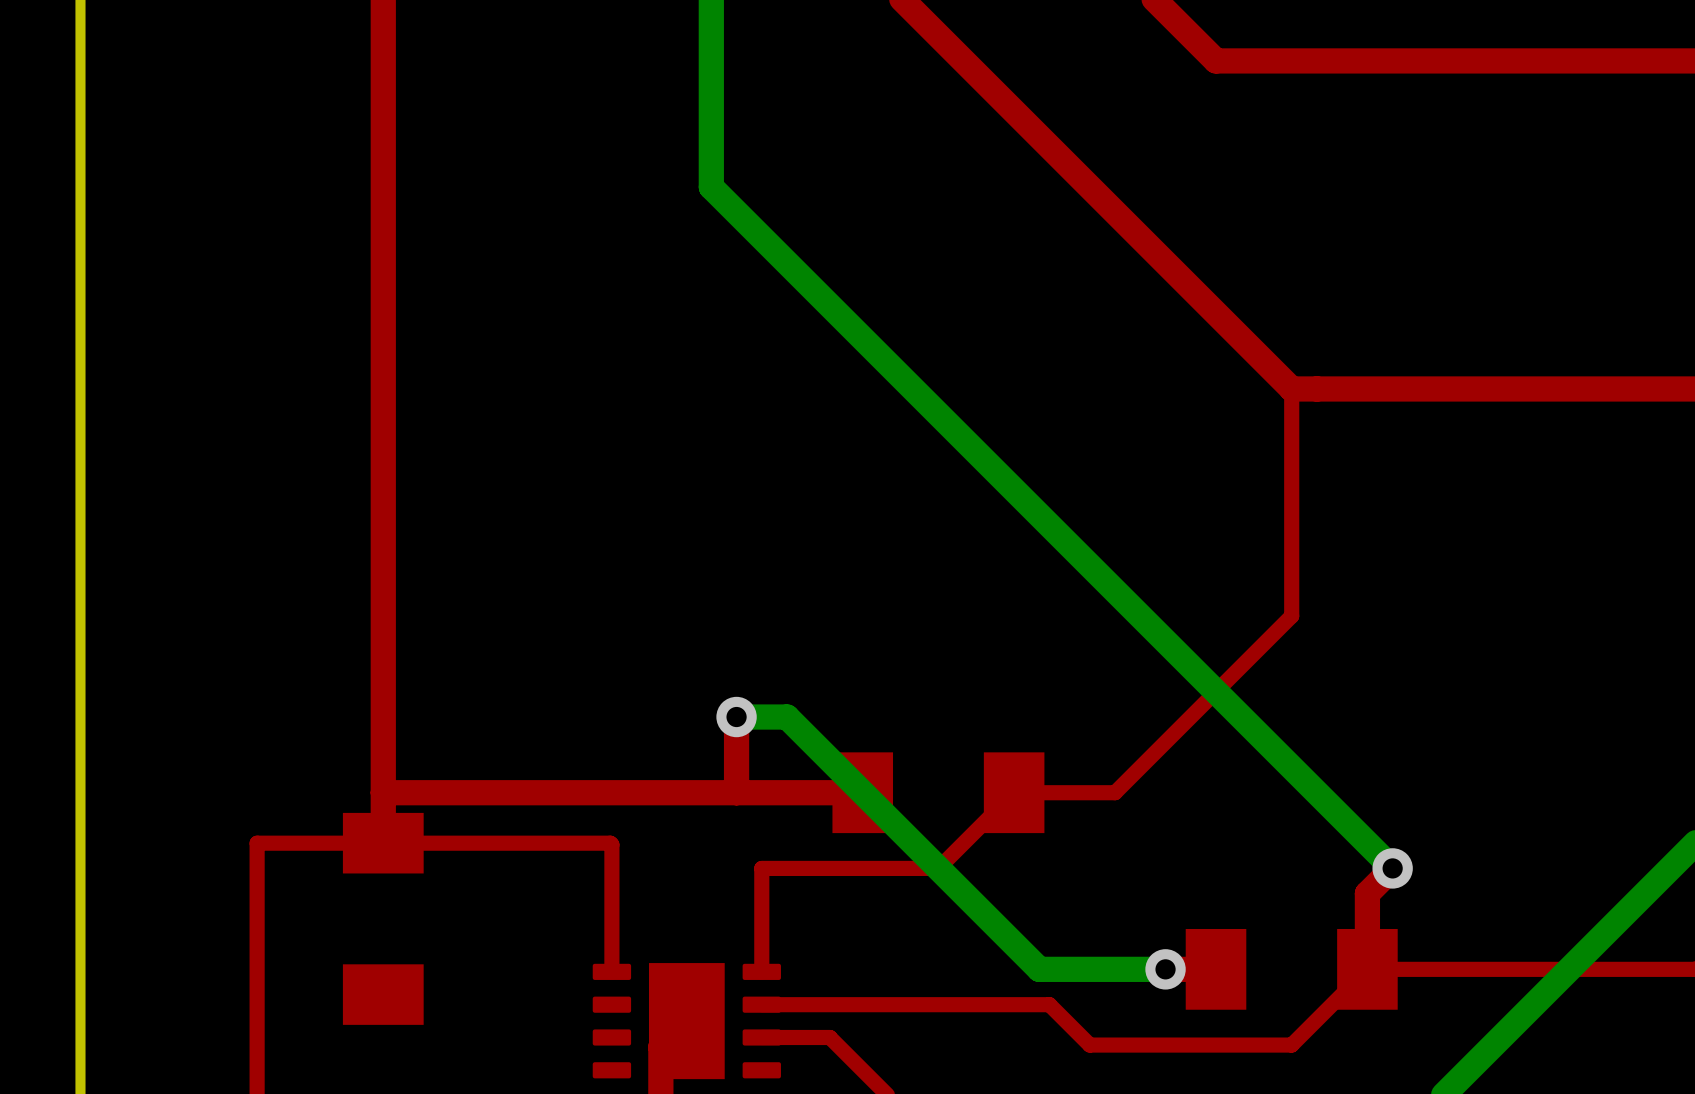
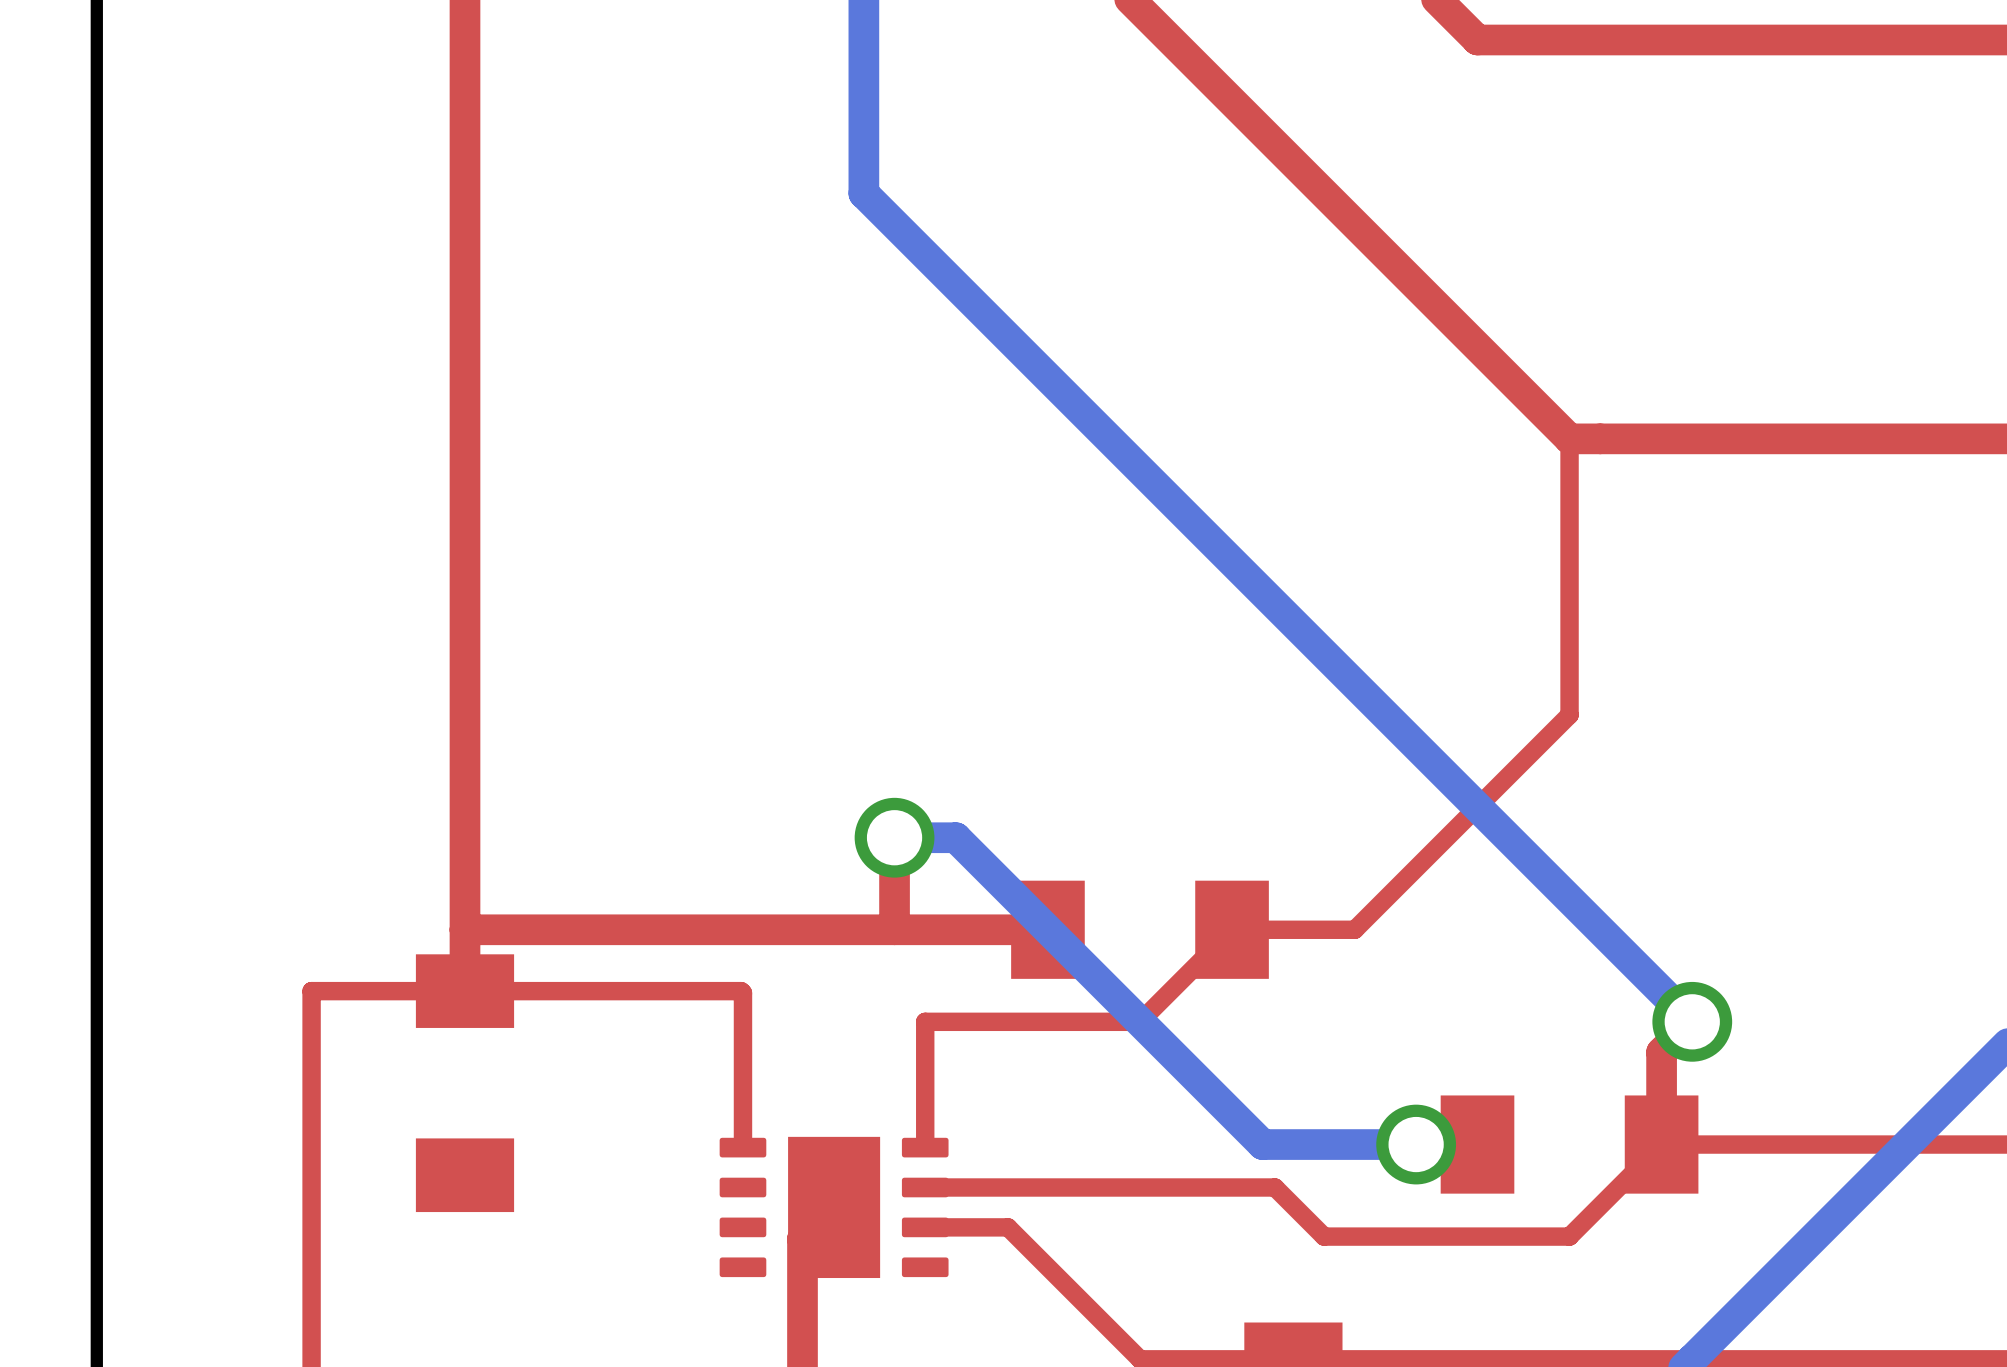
via size: [716, 696, 757, 738] -> [854, 797, 935, 878]
via size: [1372, 848, 1413, 889] -> [1652, 981, 1733, 1062]
via size: [1145, 949, 1186, 990] -> [1376, 1104, 1457, 1185]

